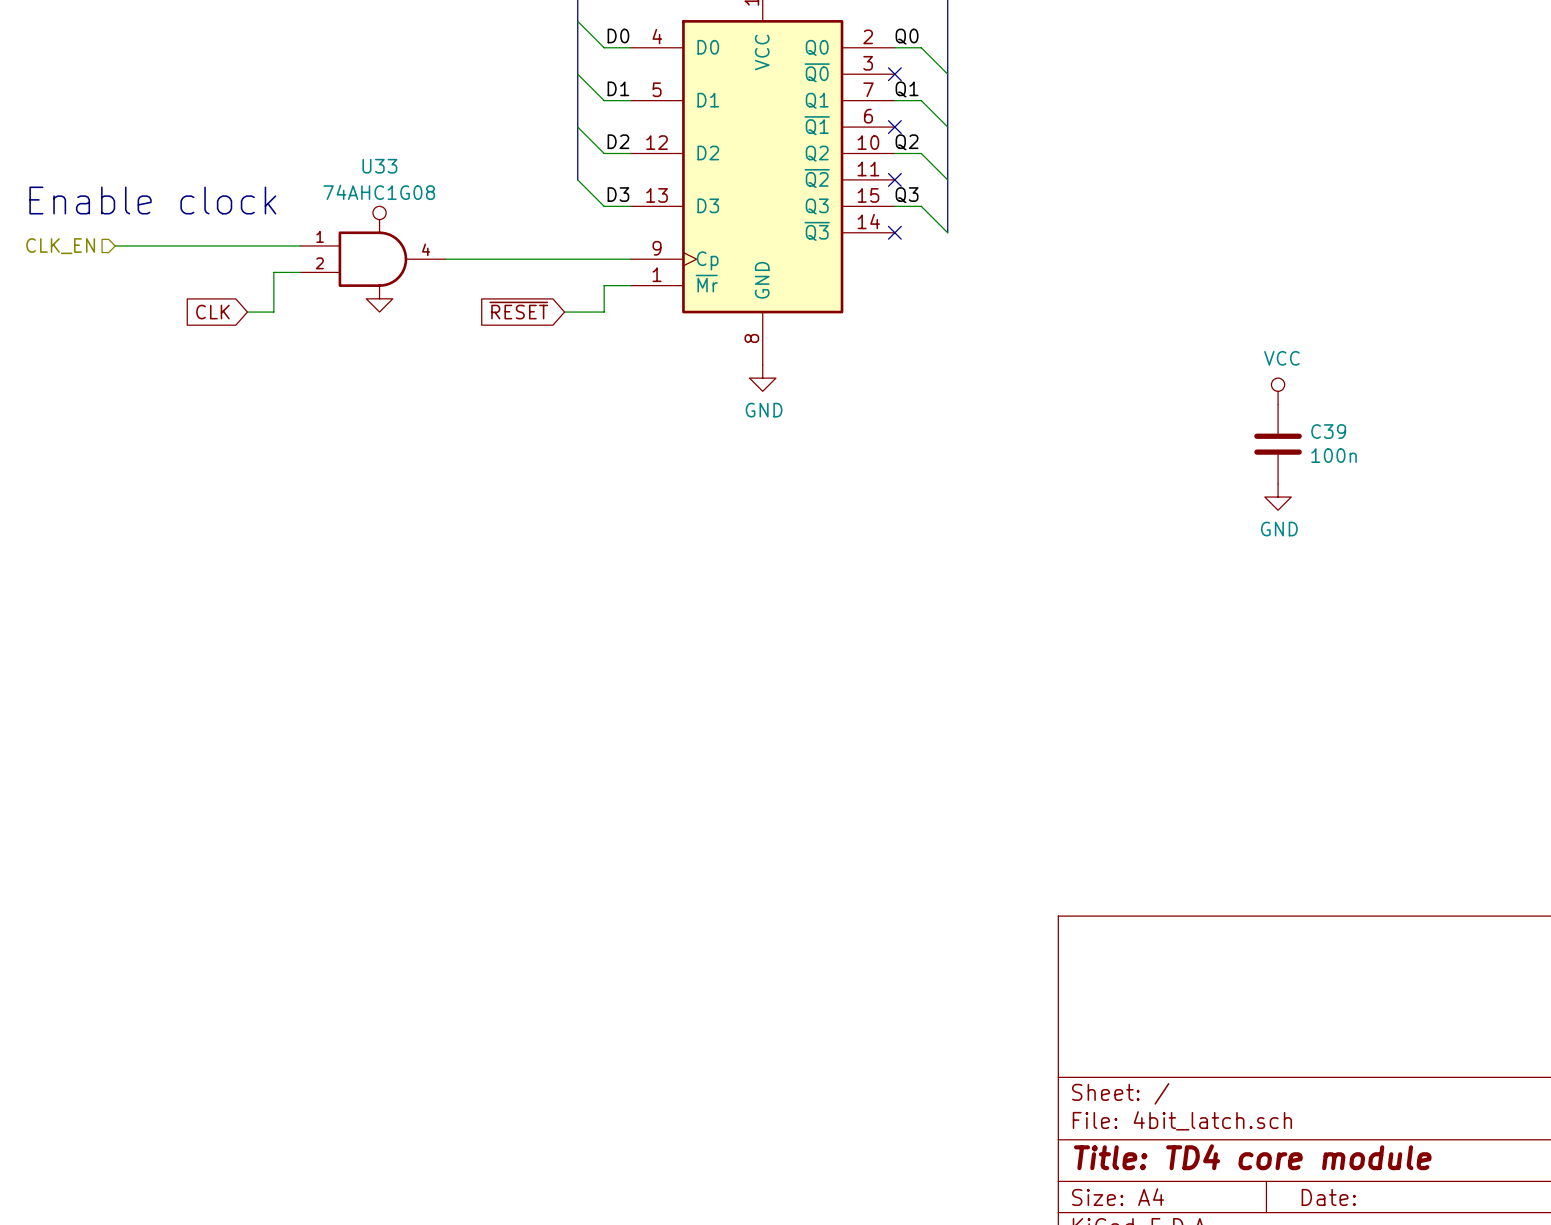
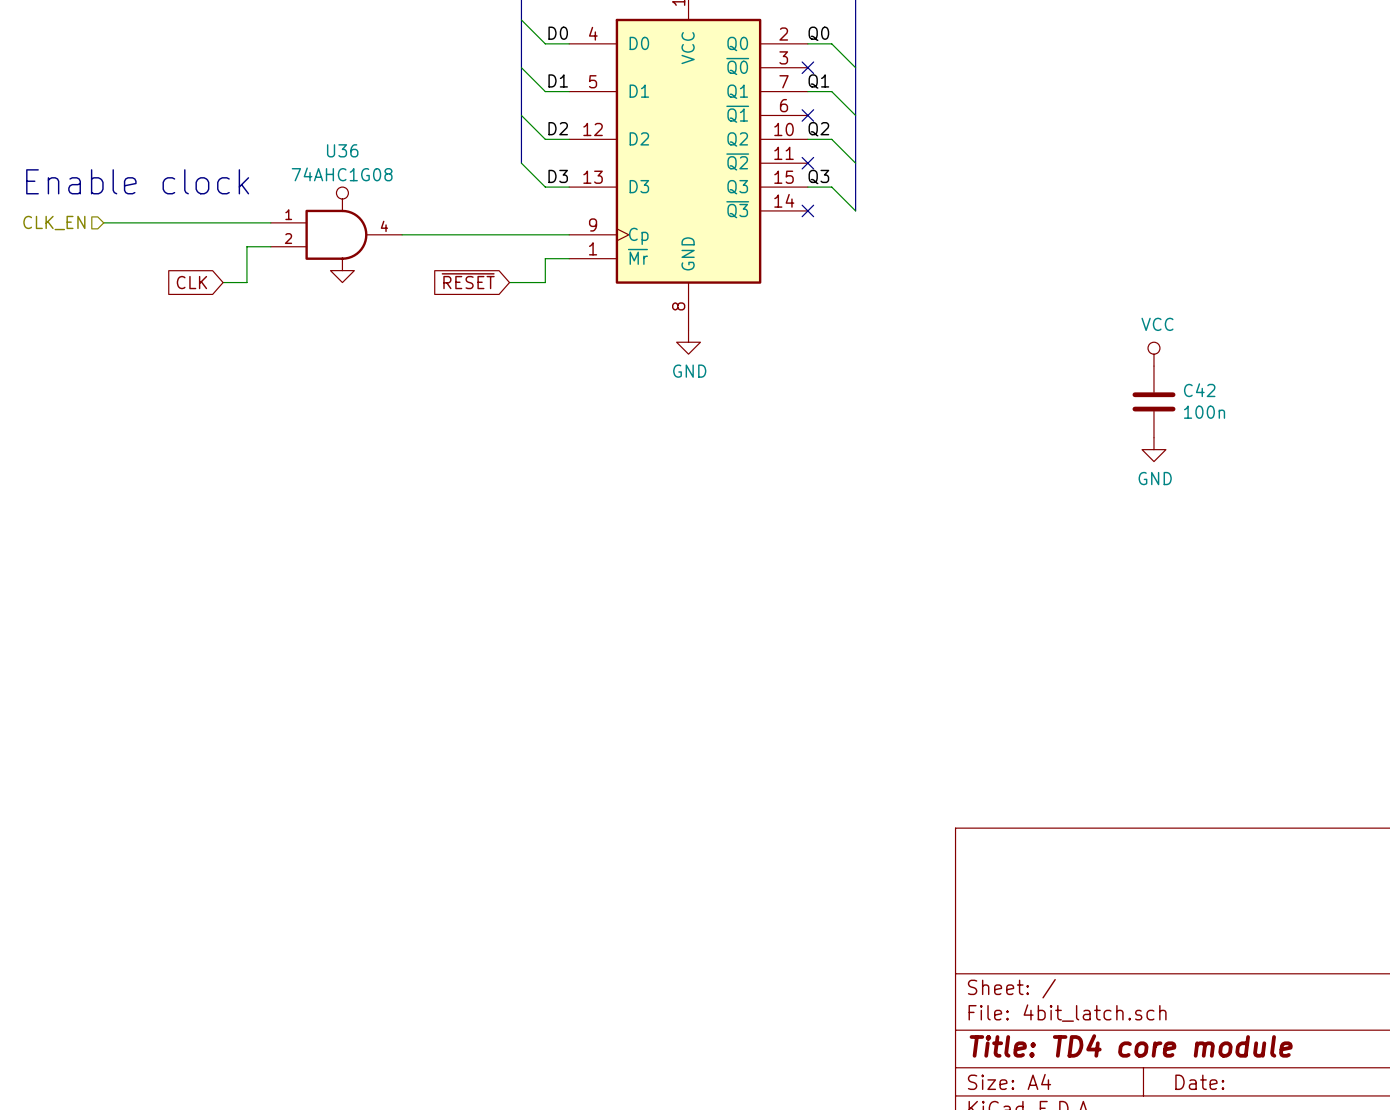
U33 name: U33 (379, 166) -> U36 (342, 150)
C39 name: C39 (1328, 431) -> C42 (1199, 390)

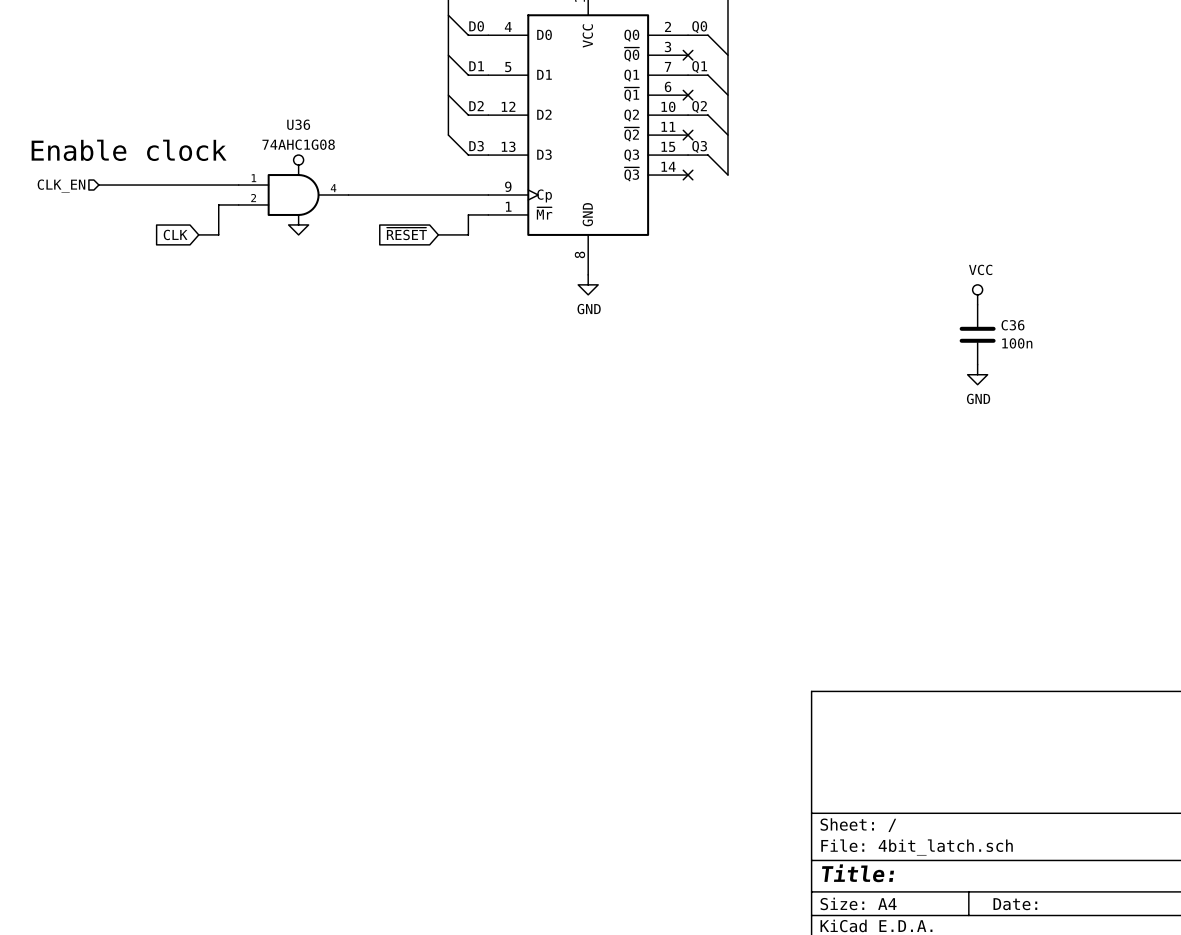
C42 name: C42 (1199, 390) -> C36 (1012, 325)
title block: Title: TD4 core module (1131, 1045) -> Title: (858, 873)

